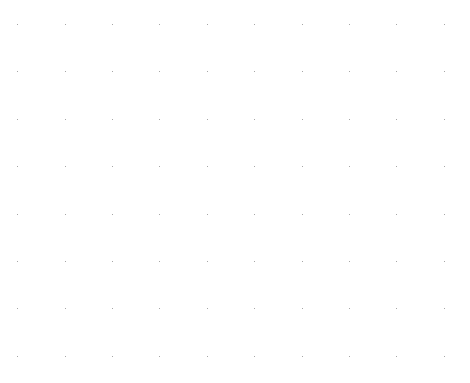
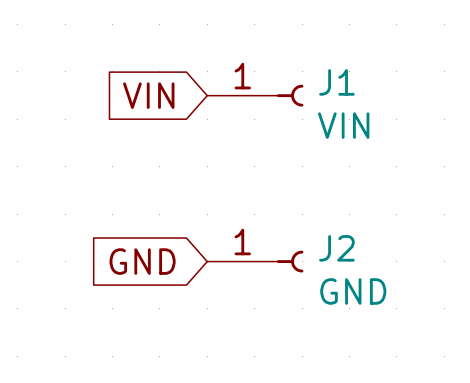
global label: none -> VIN (148, 95)
J1: none -> VIN (255, 95)
global label: none -> GND (142, 261)
J2: none -> GND (255, 261)

